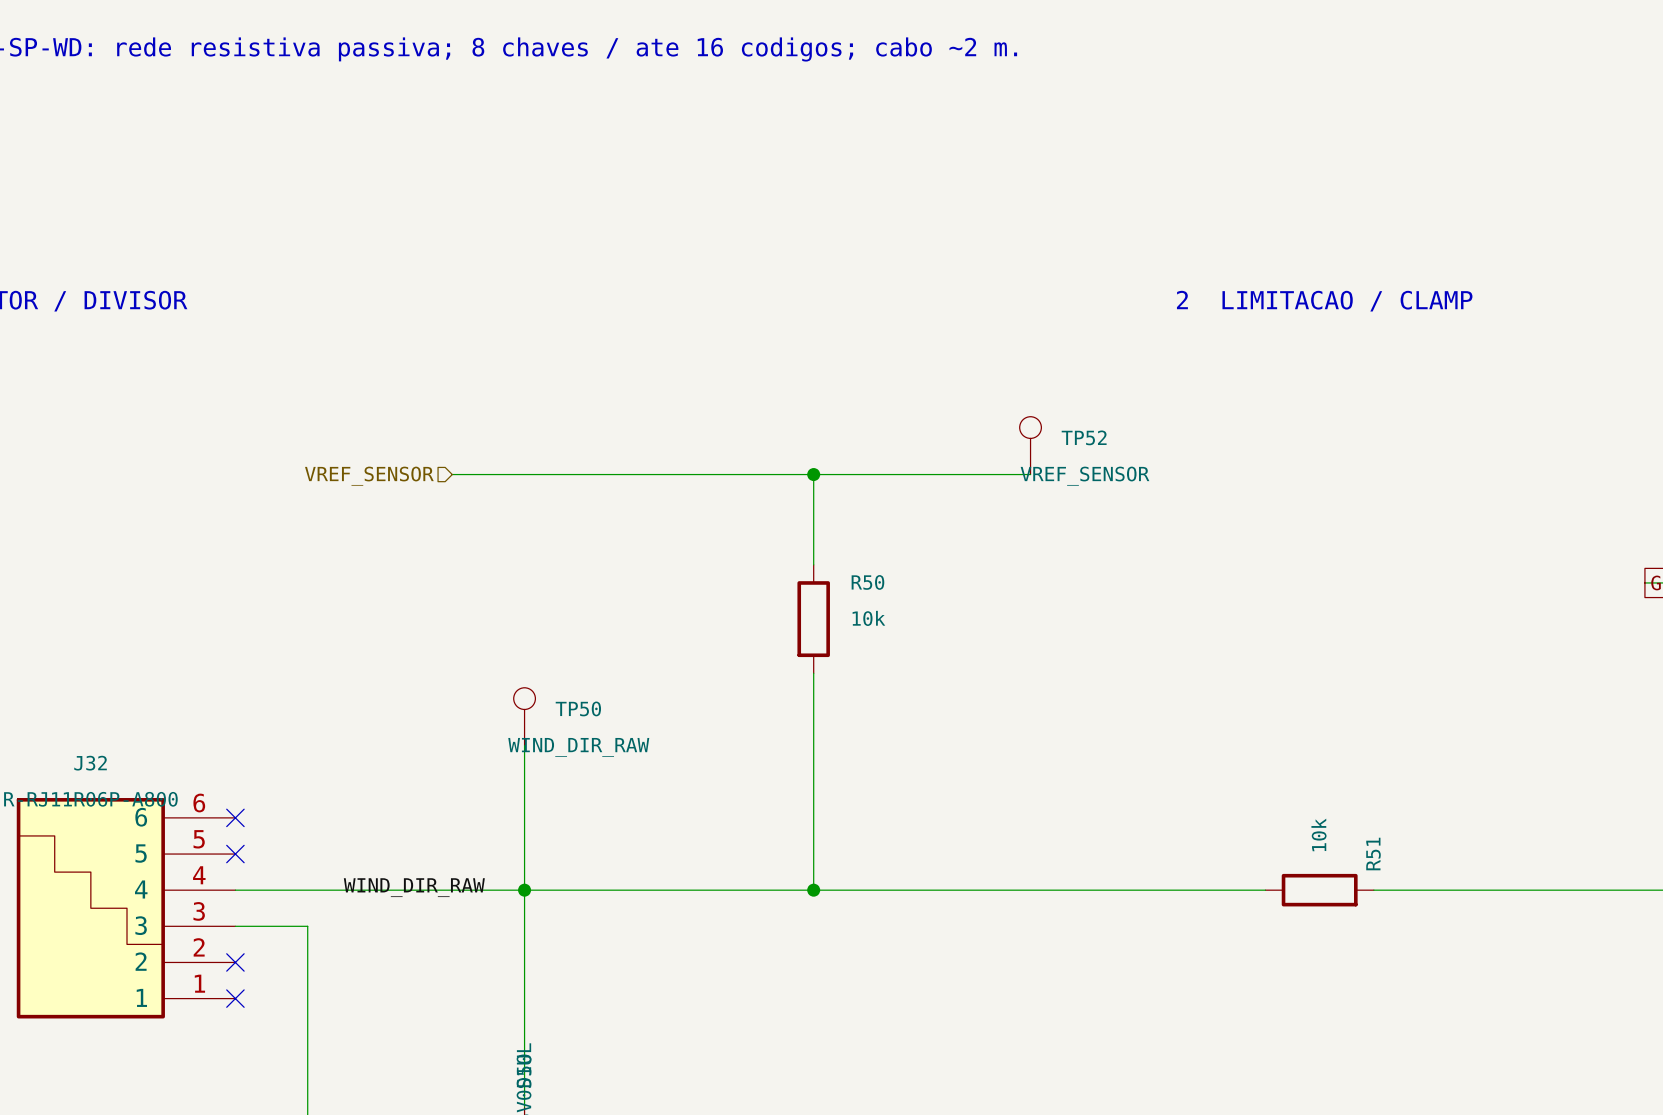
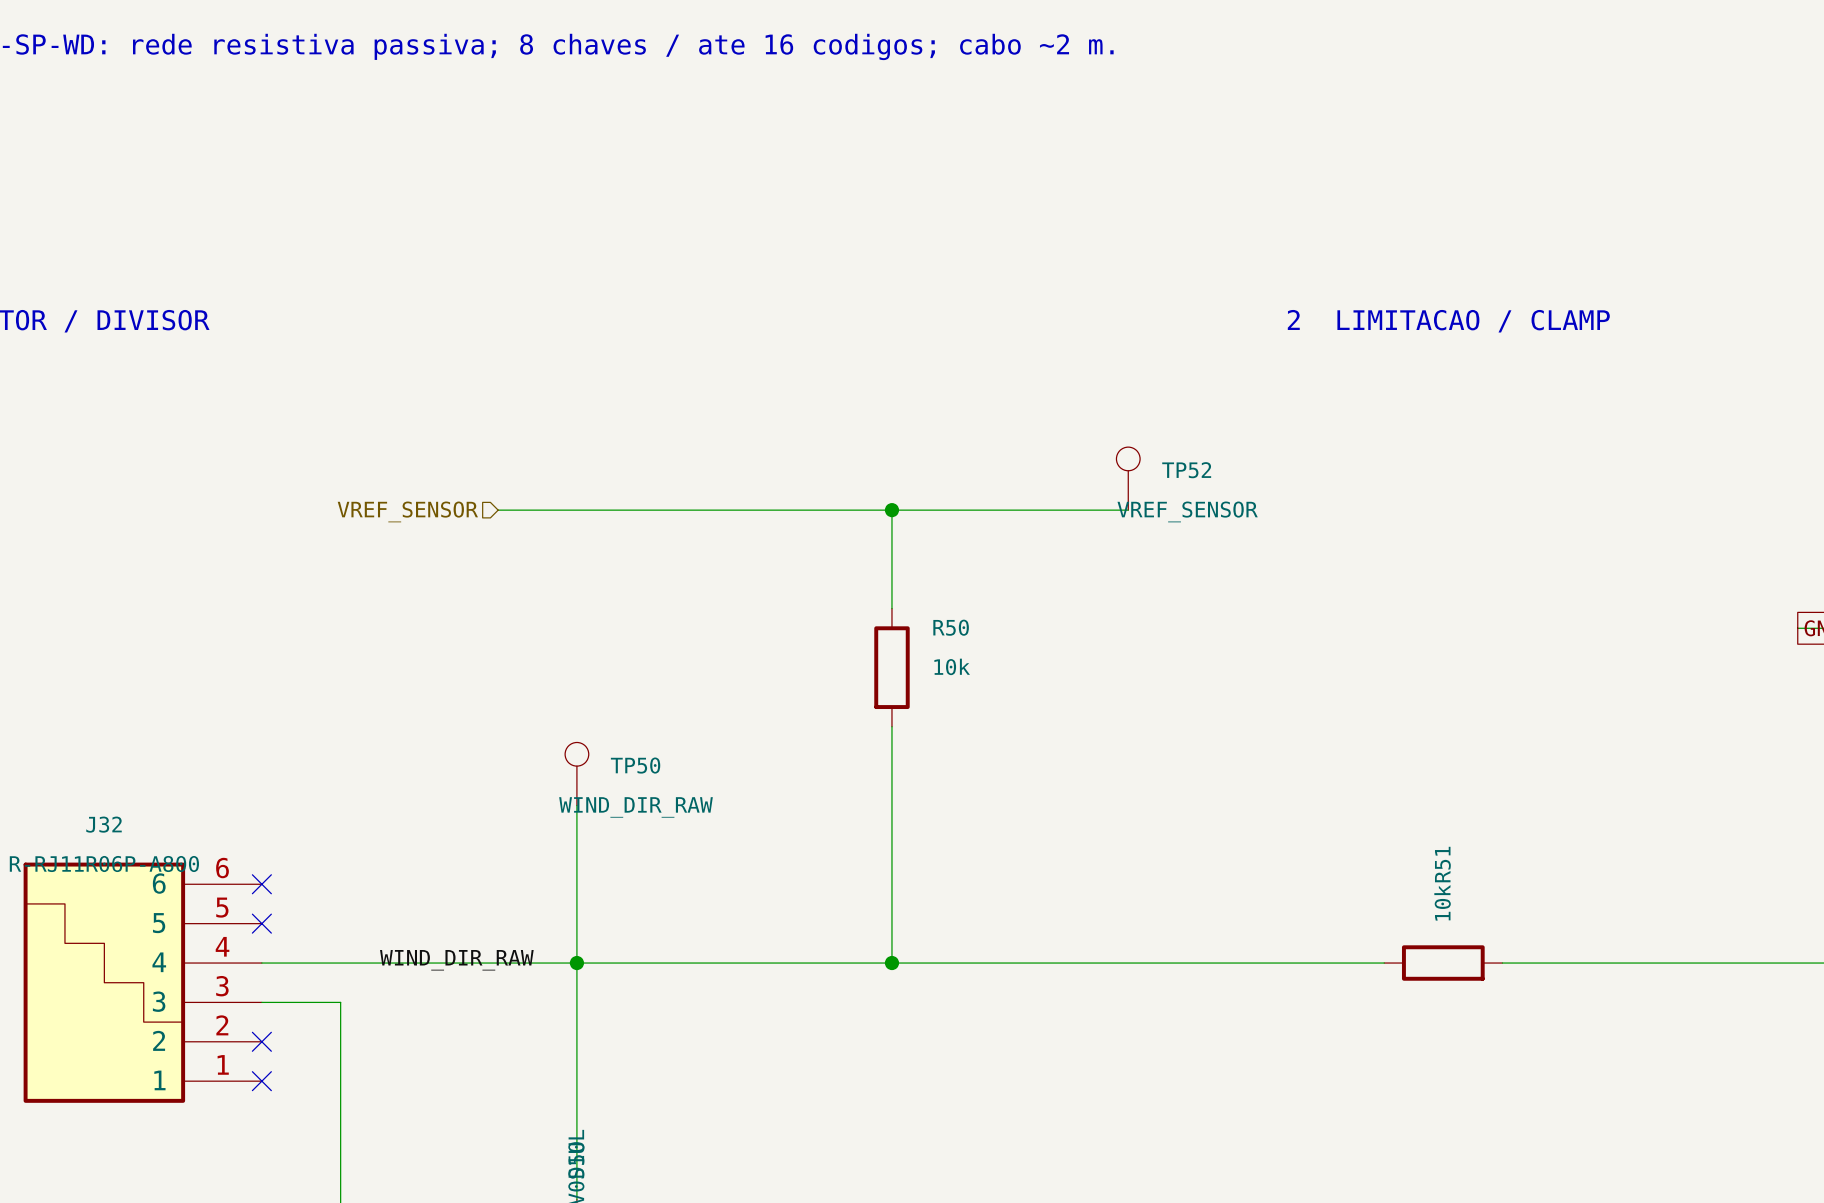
R51 name position: R51 (1373, 854) -> R51 (1442, 864)

